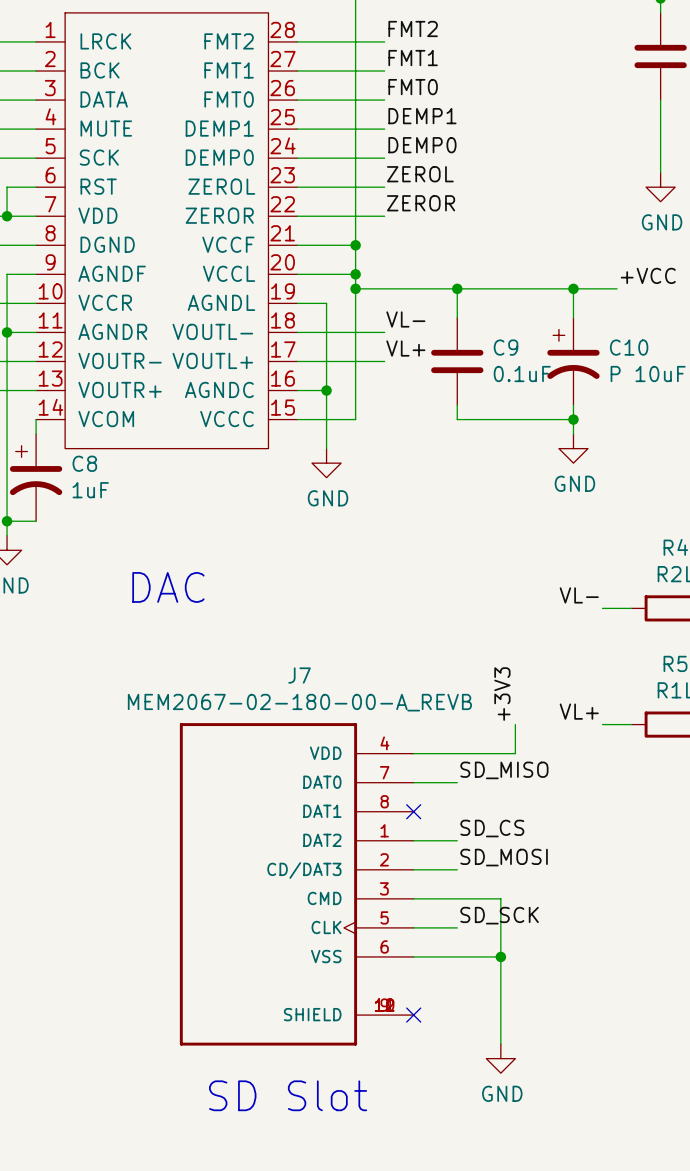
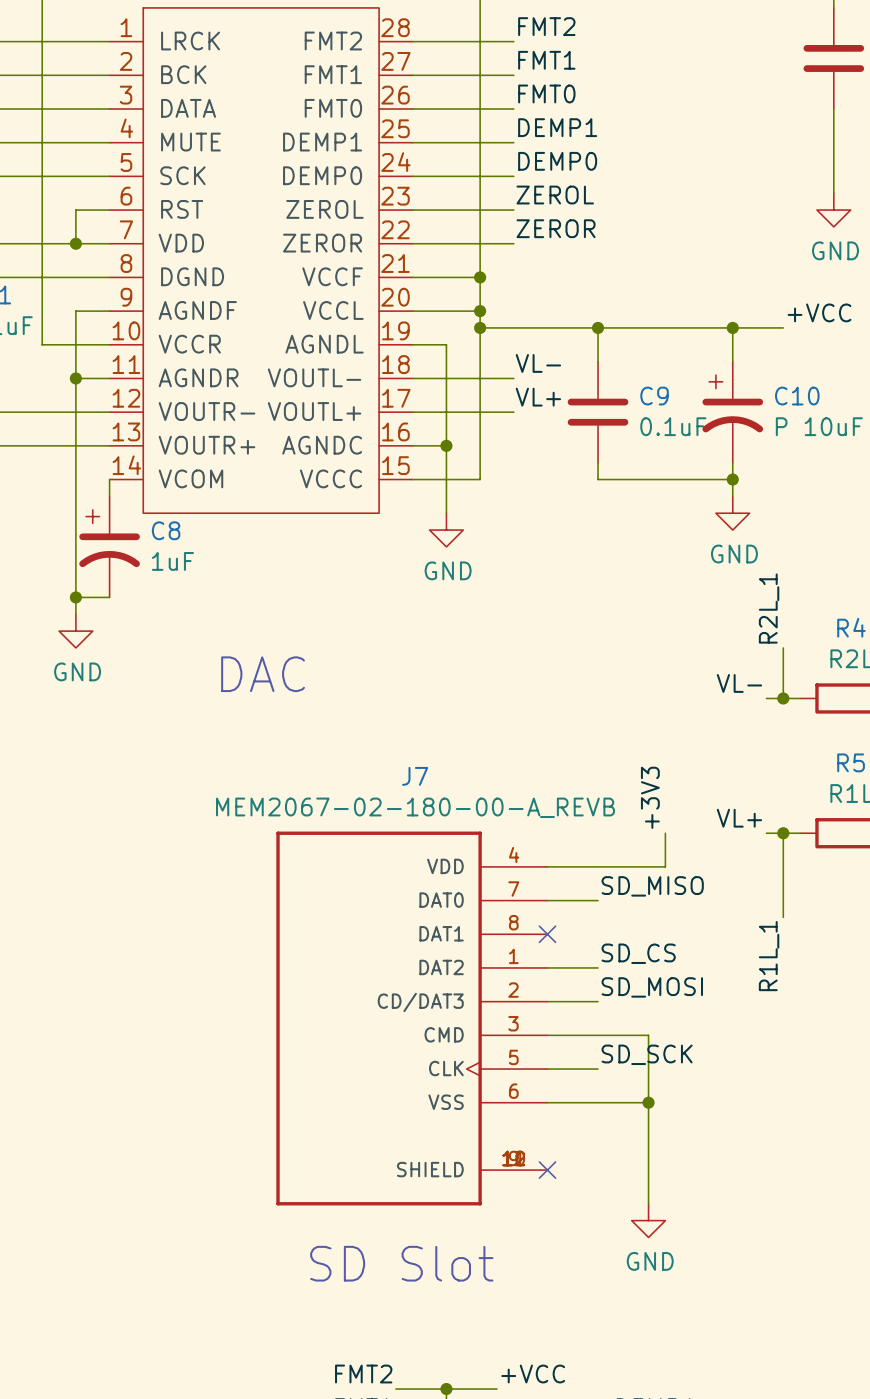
label: none -> R2L_1 (769, 608)
wire: none -> (783, 647) (783, 698)
junction: none -> (783, 698)
wire: none -> (783, 833) (783, 917)
junction: none -> (783, 833)
label: none -> R1L_1 (769, 956)

